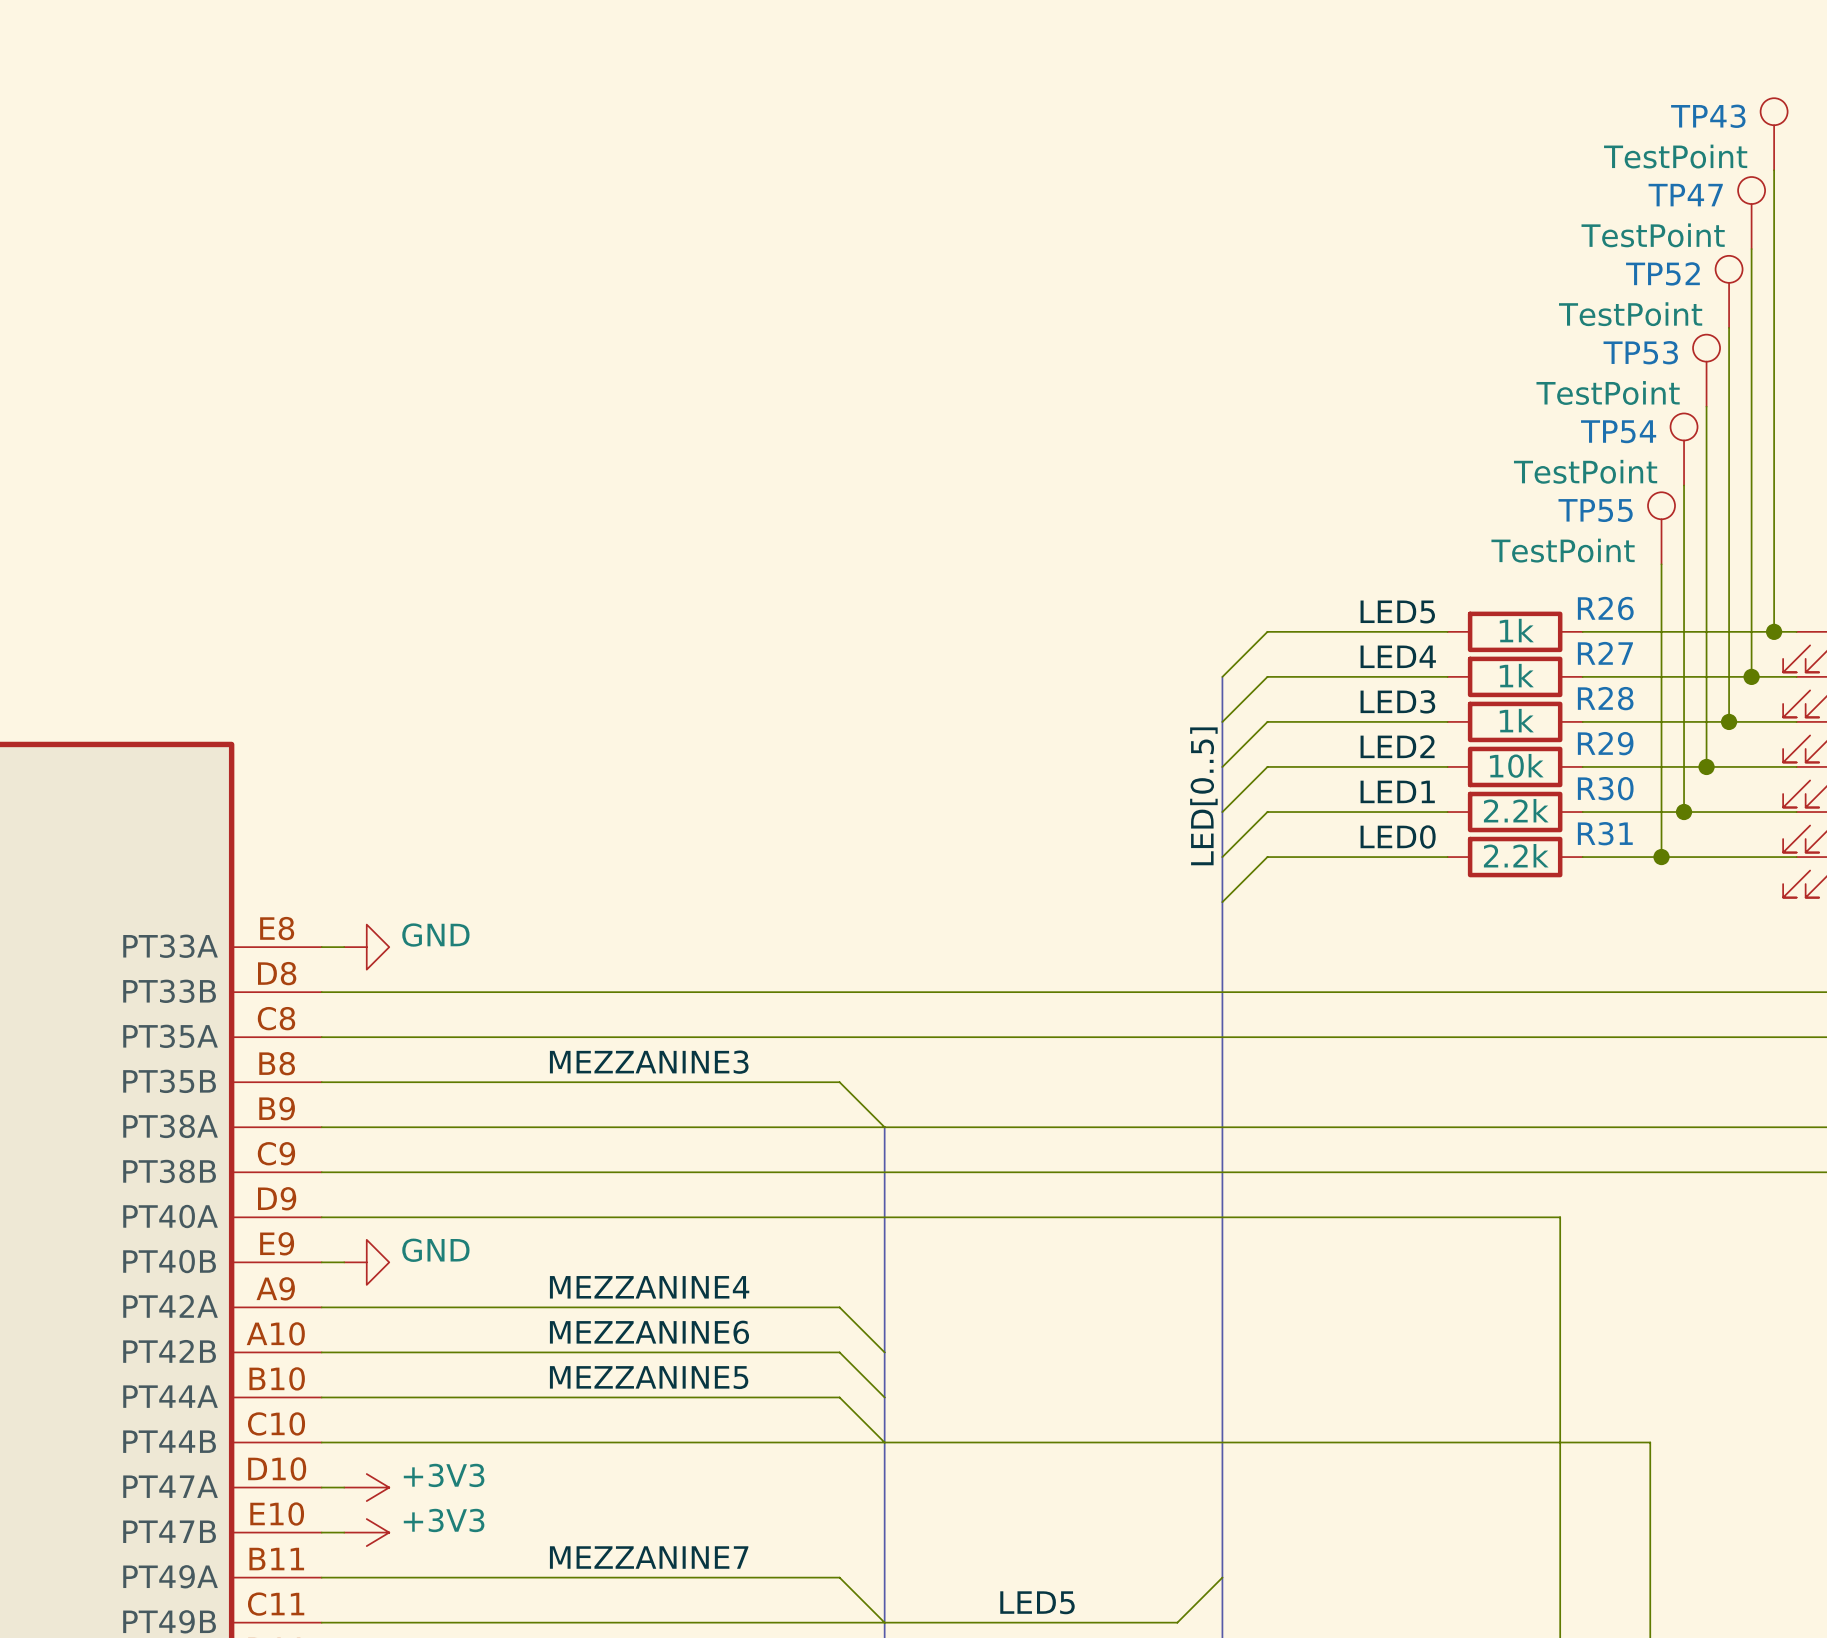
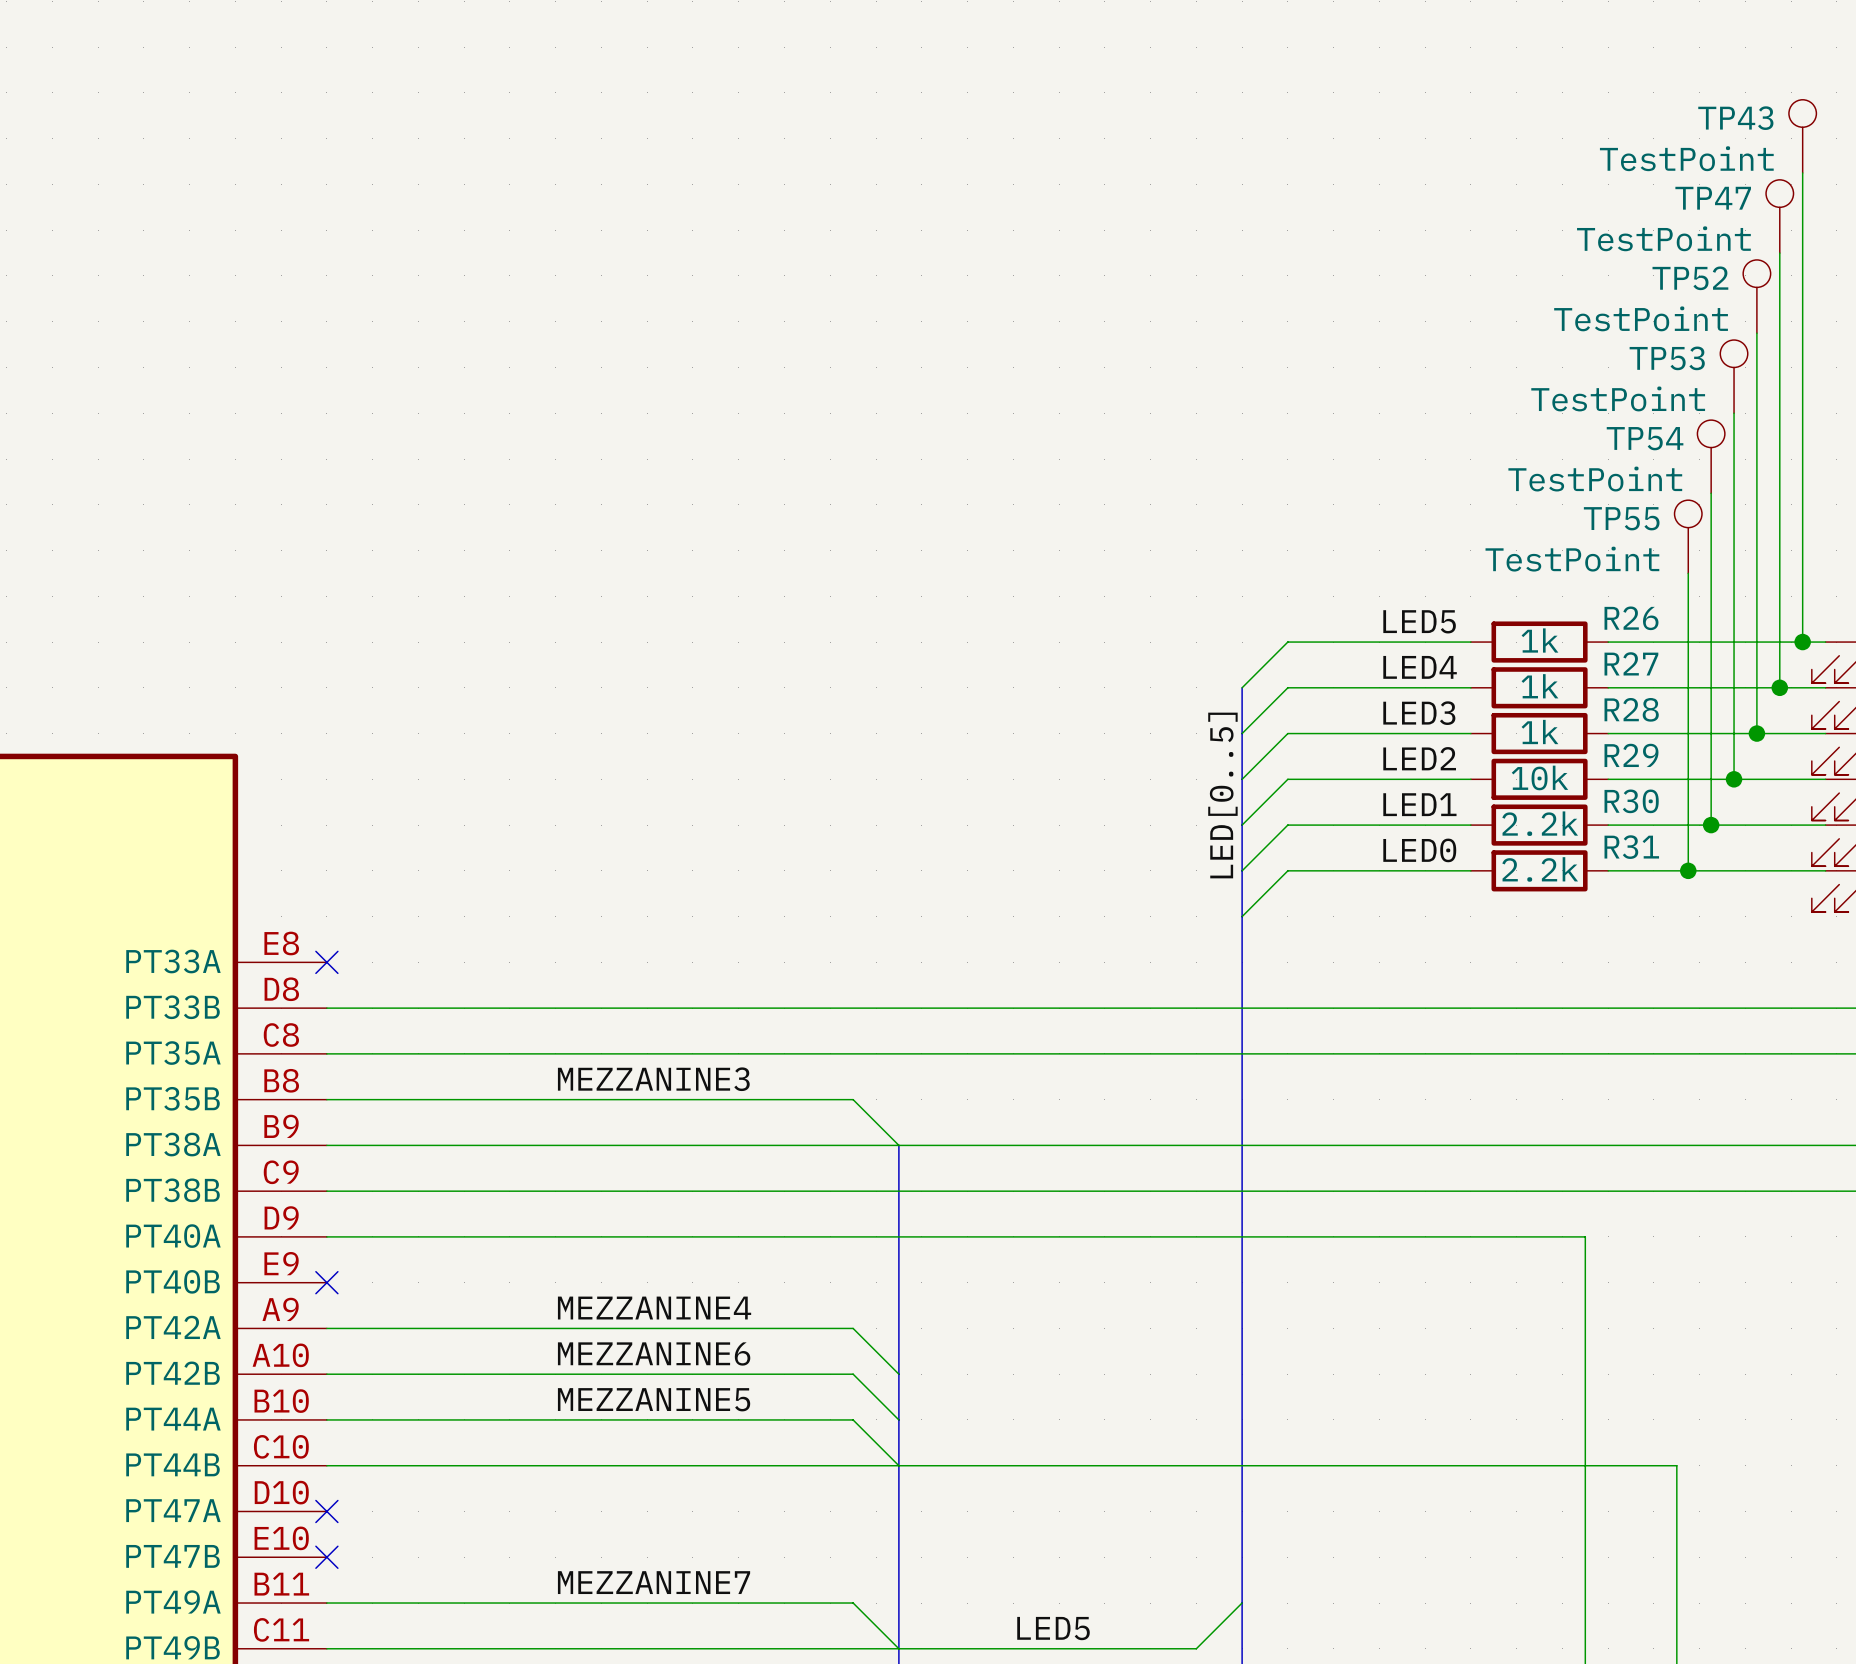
wire: (321, 947) (344, 947) -> none
no-connect mark: none -> (326, 962)
power symbol: GND (366, 947) -> none
wire: (321, 1262) (344, 1262) -> none
no-connect mark: none -> (326, 1282)
power symbol: GND (366, 1262) -> none
wire: (321, 1487) (344, 1487) -> none
no-connect mark: none -> (326, 1511)
power symbol: +3V3 (366, 1487) -> none
wire: (321, 1532) (344, 1532) -> none
no-connect mark: none -> (326, 1557)
power symbol: +3V3 (366, 1532) -> none

